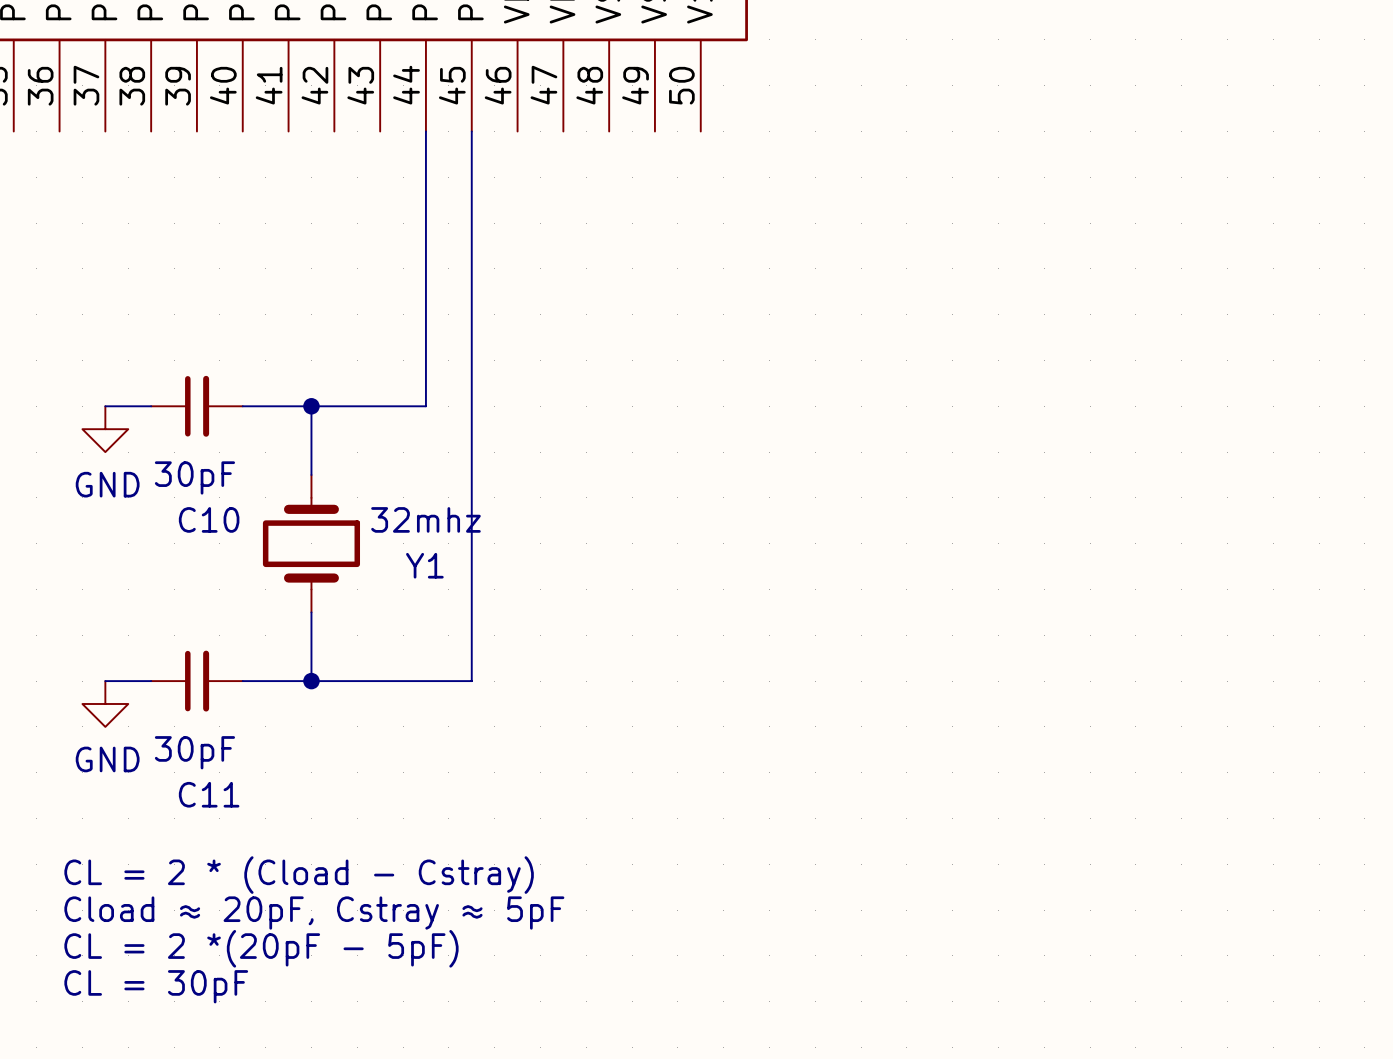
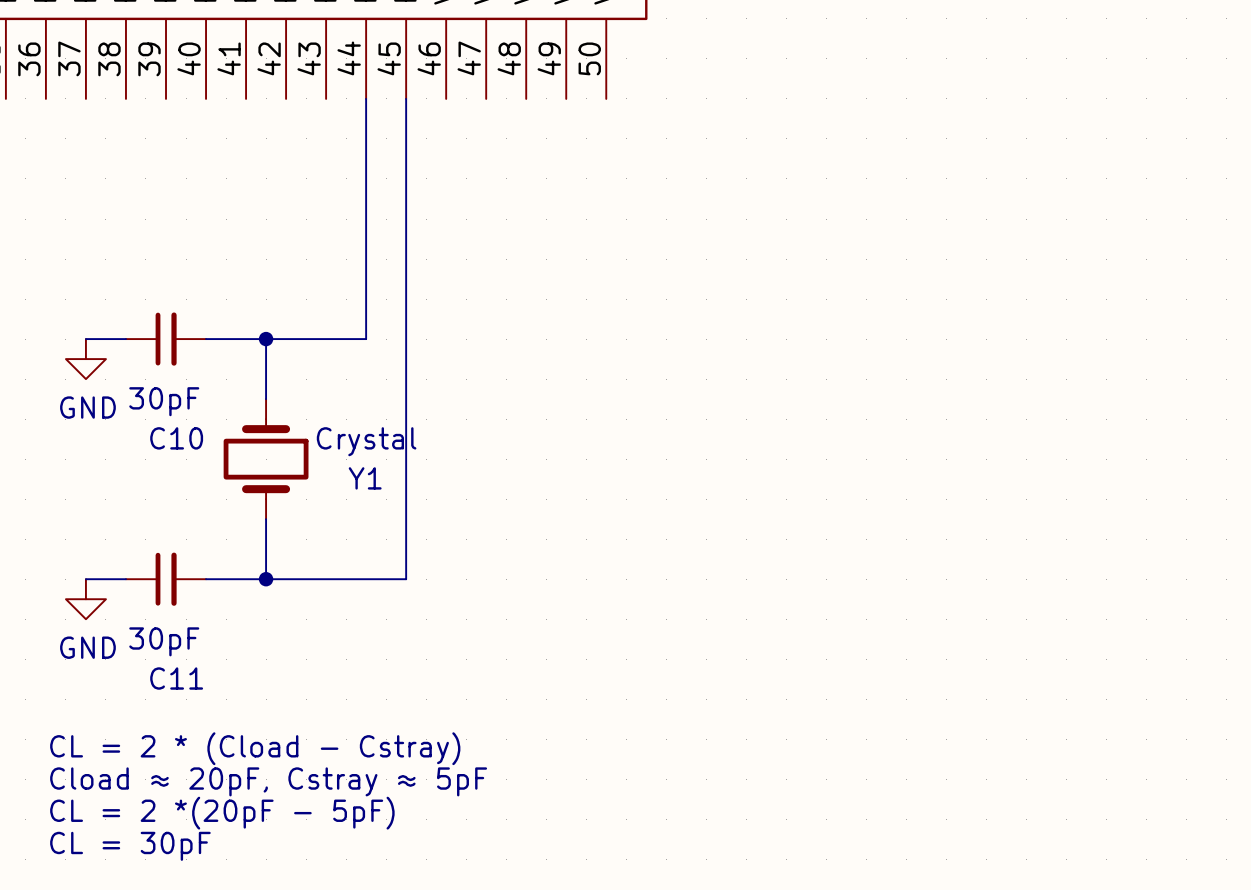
Y1 value: 32mhz (425, 519) -> Crystal (366, 441)

